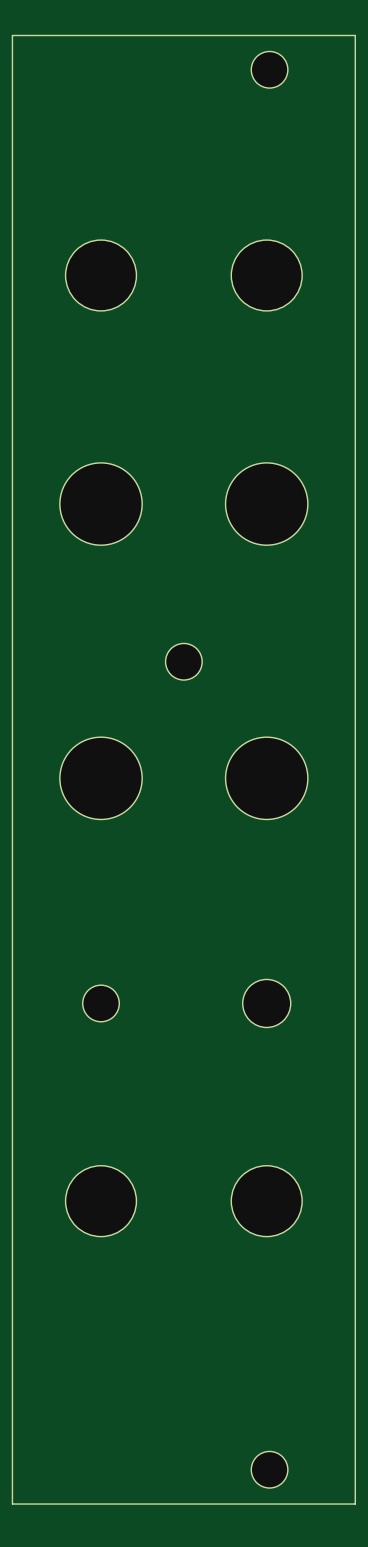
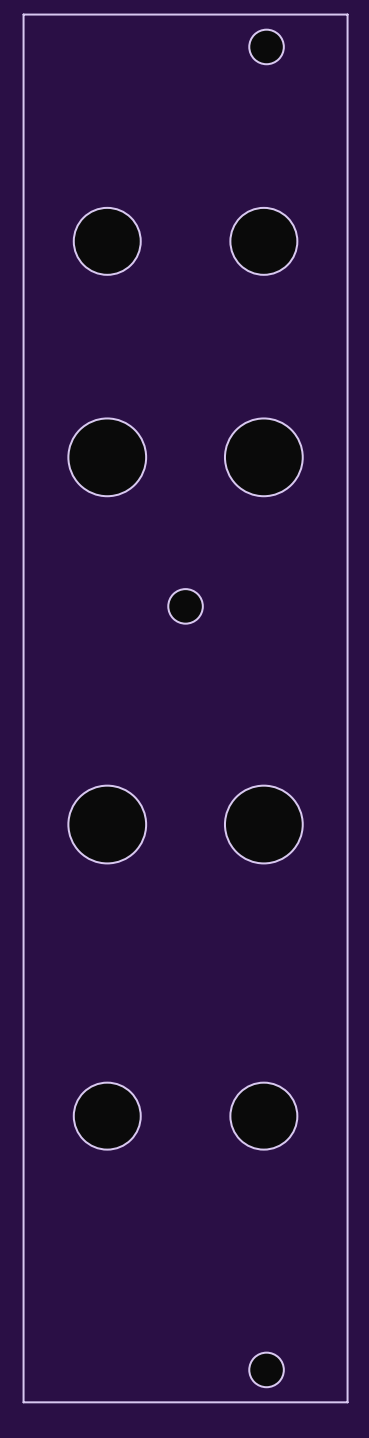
part: (101, 778) -> none
part: (266, 778) -> none
part: none -> (107, 824)
part: none -> (263, 824)
part: (101, 1003) -> none
part: (266, 1003) -> none

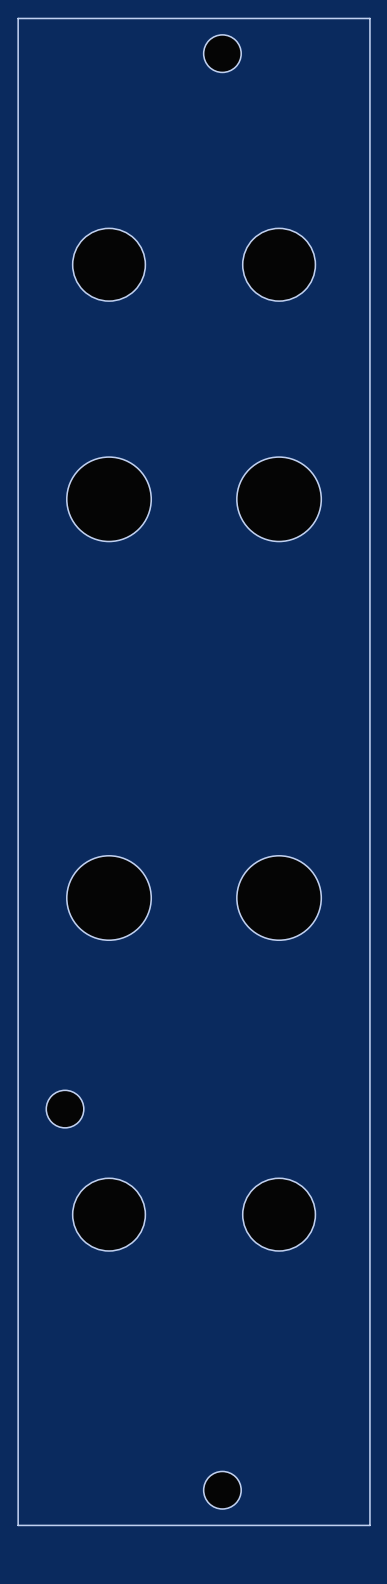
part position: (266, 46) -> (222, 53)
part: (185, 606) -> none
part: none -> (65, 1109)
part position: (266, 1369) -> (222, 1490)

